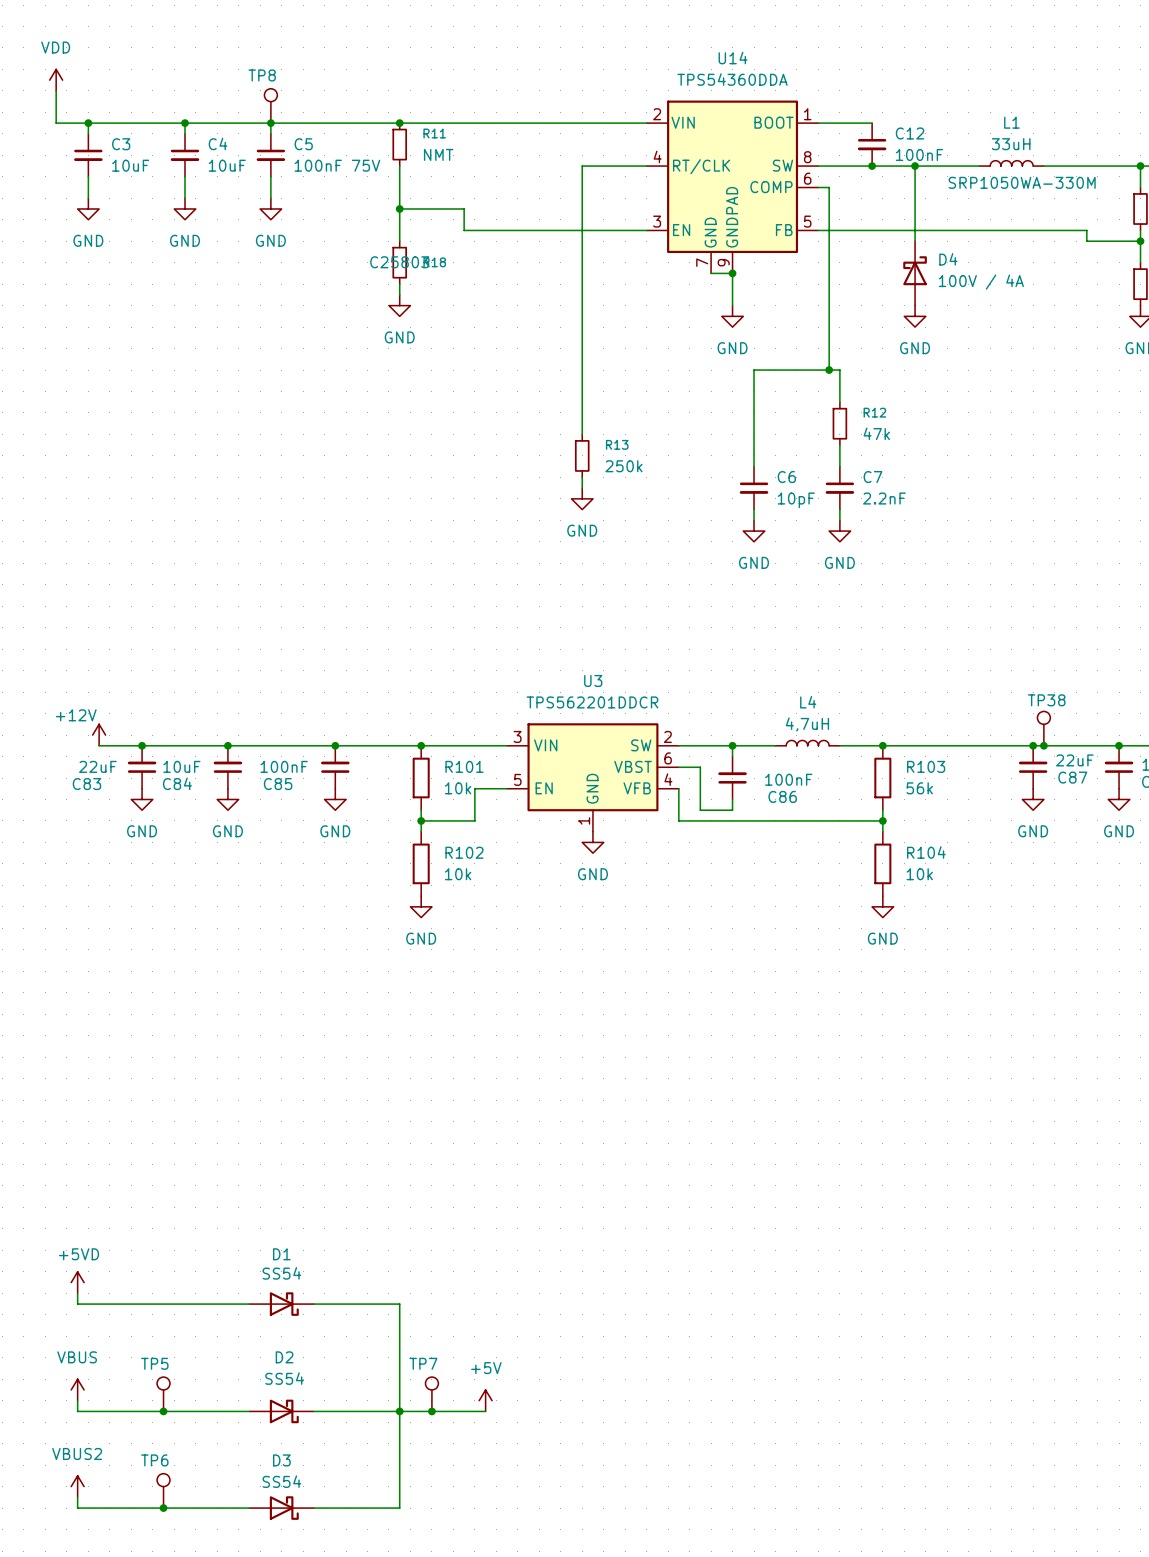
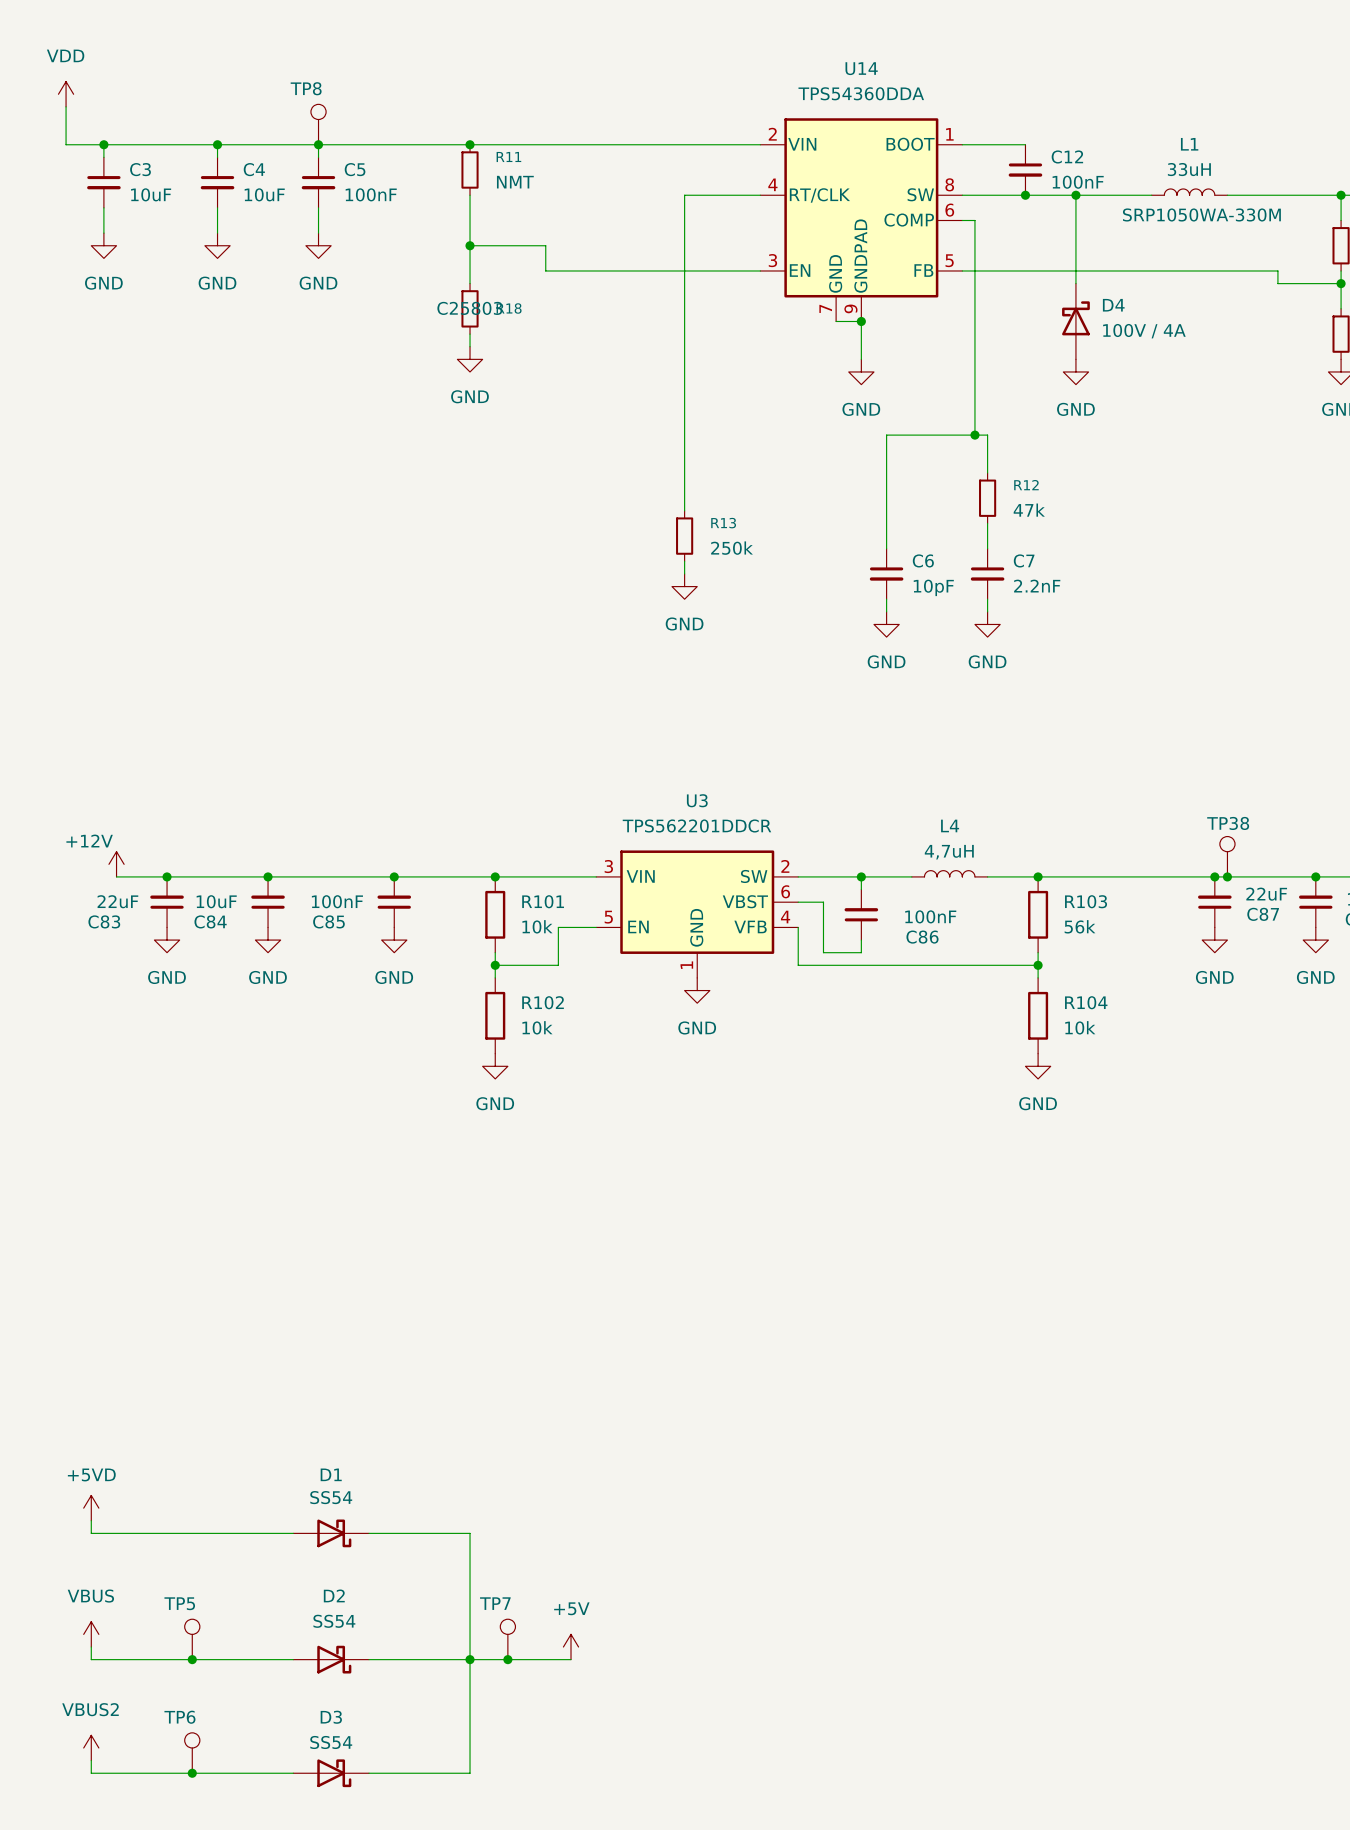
C5 value: 100nF 75V (337, 165) -> 100nF (371, 194)

